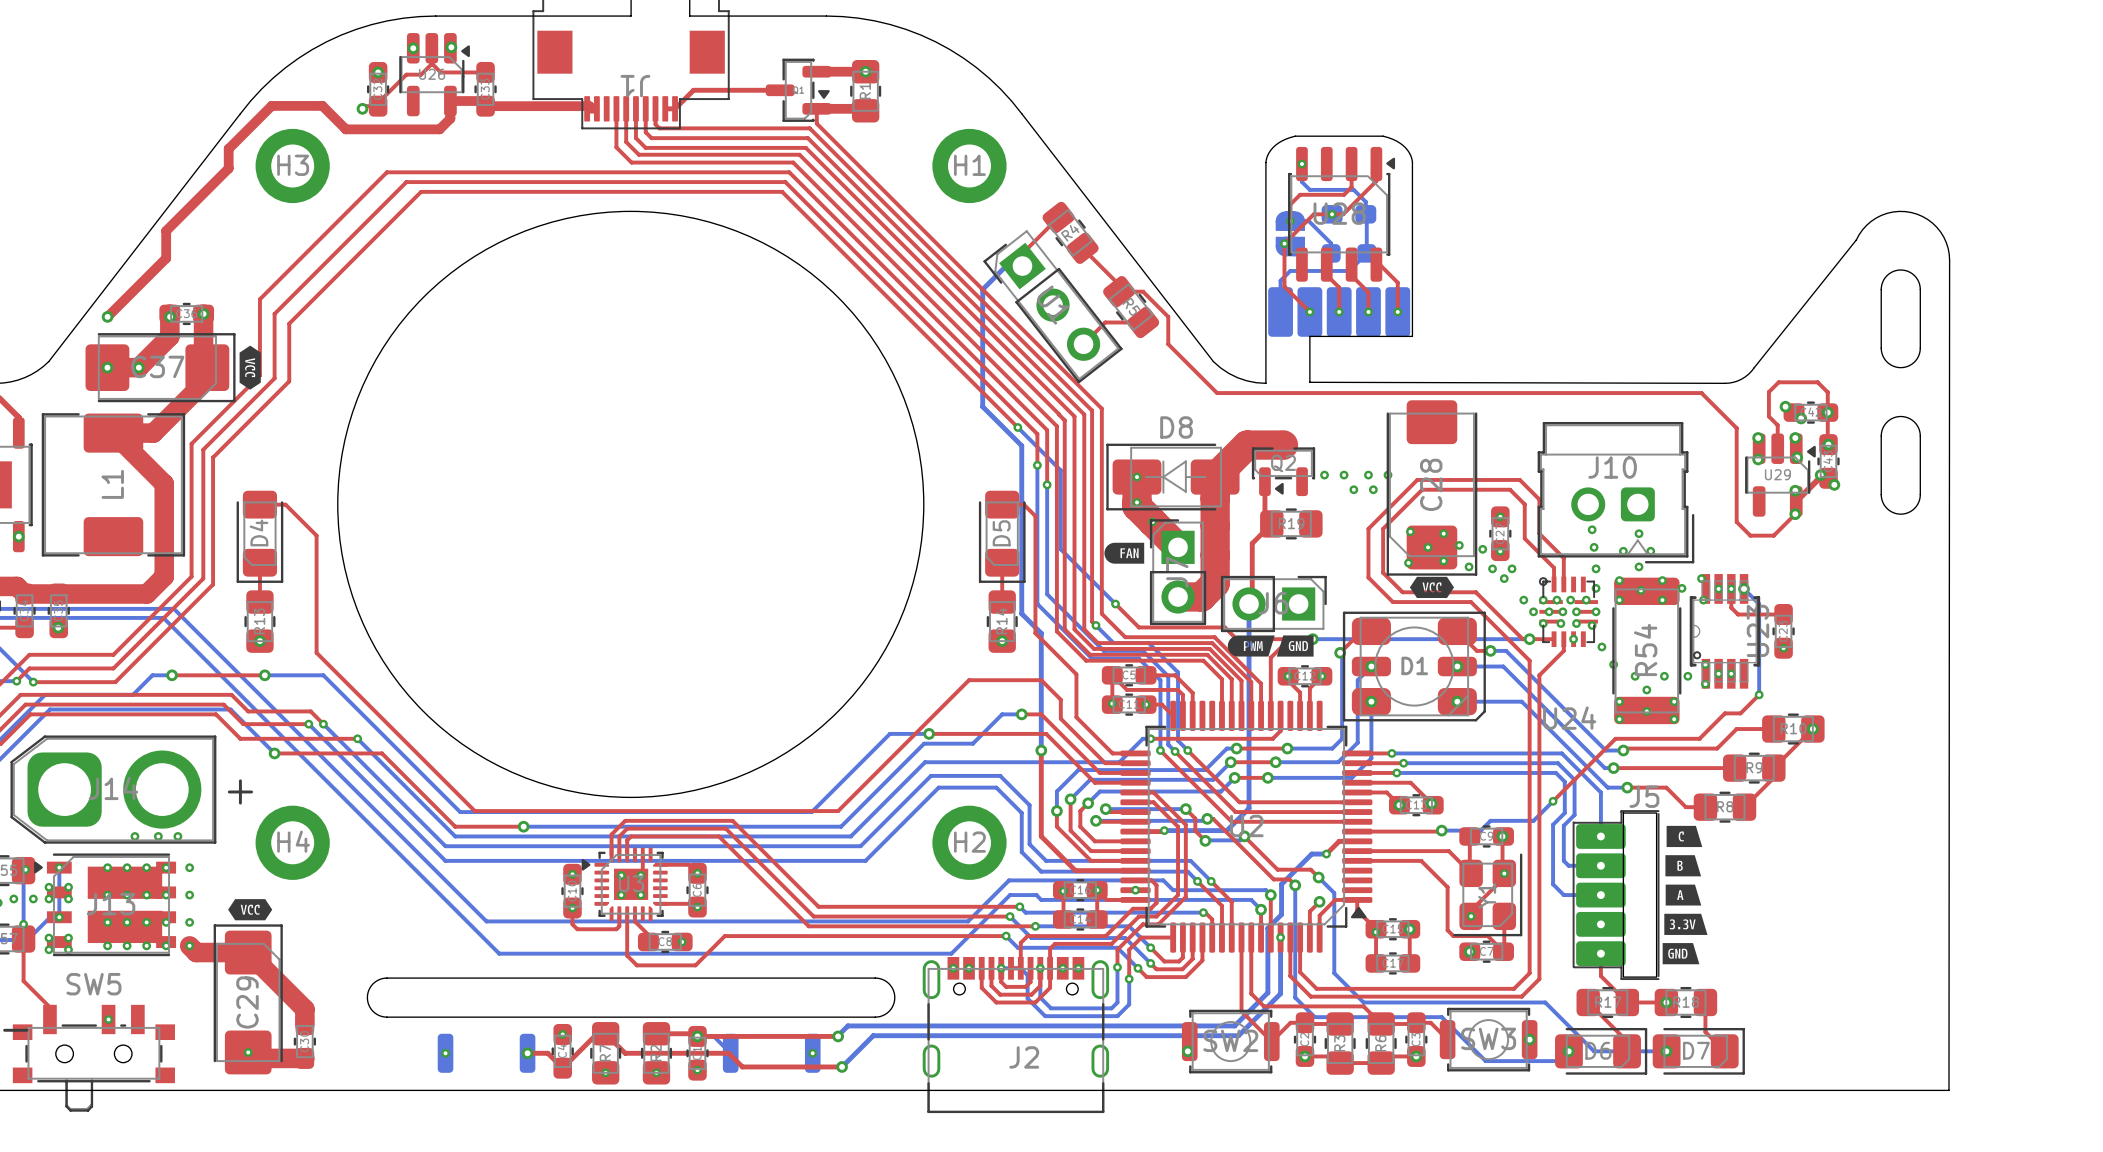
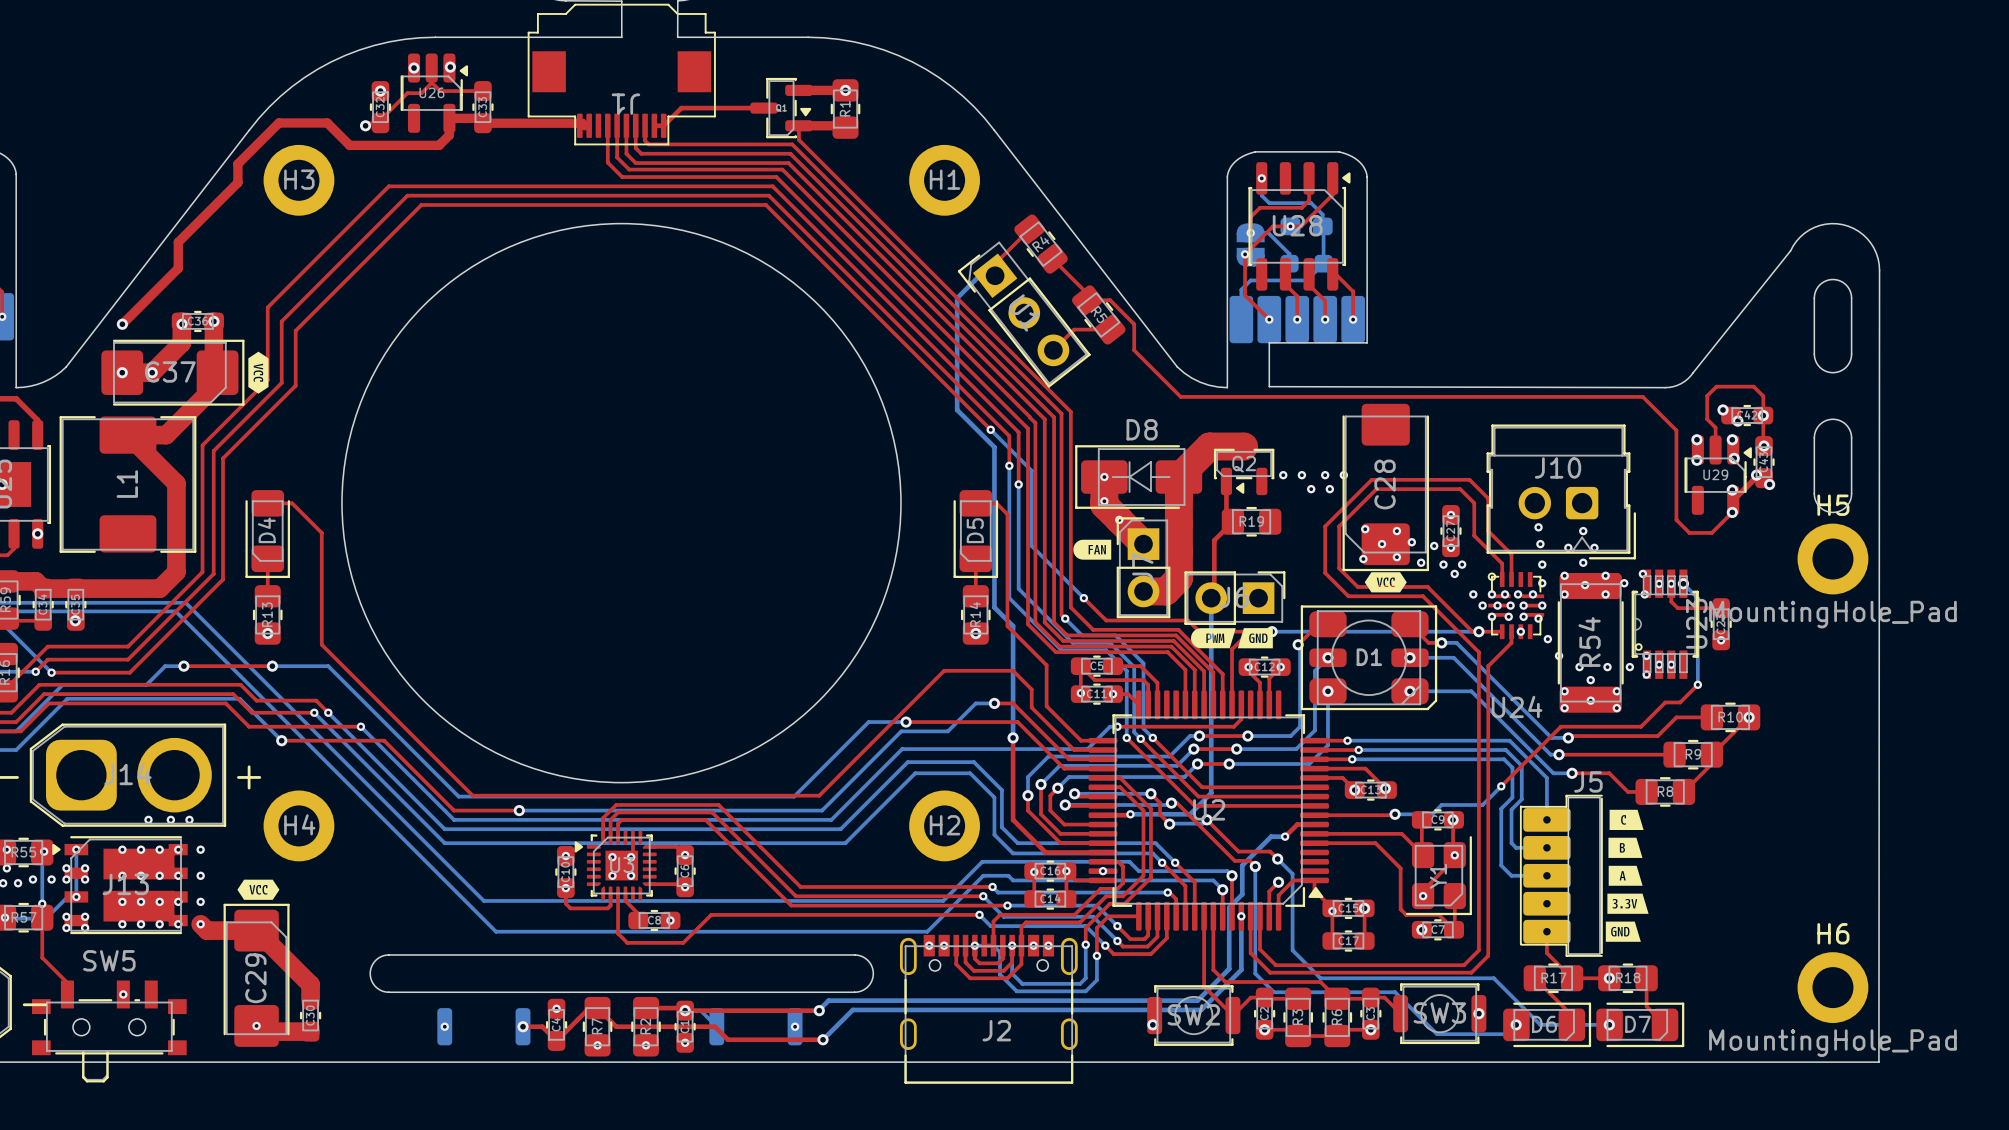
H5: none -> MountingHole_Pad (1832, 559)
H6: none -> MountingHole_Pad (1832, 987)

